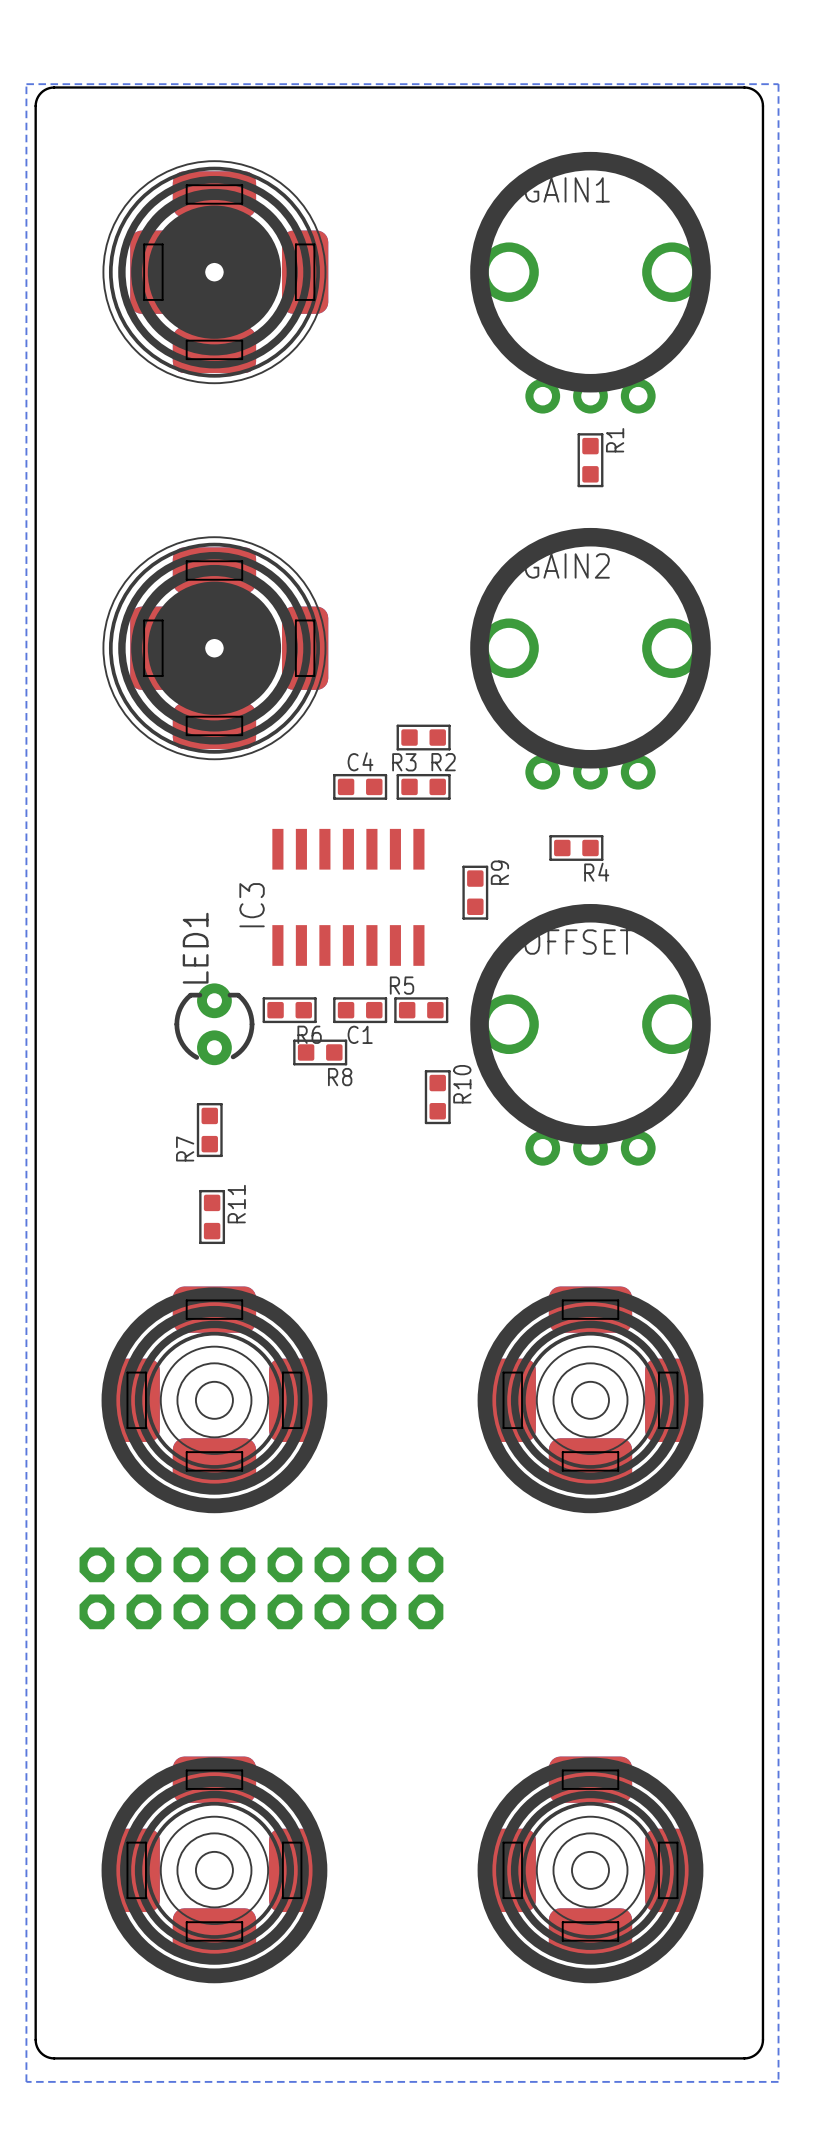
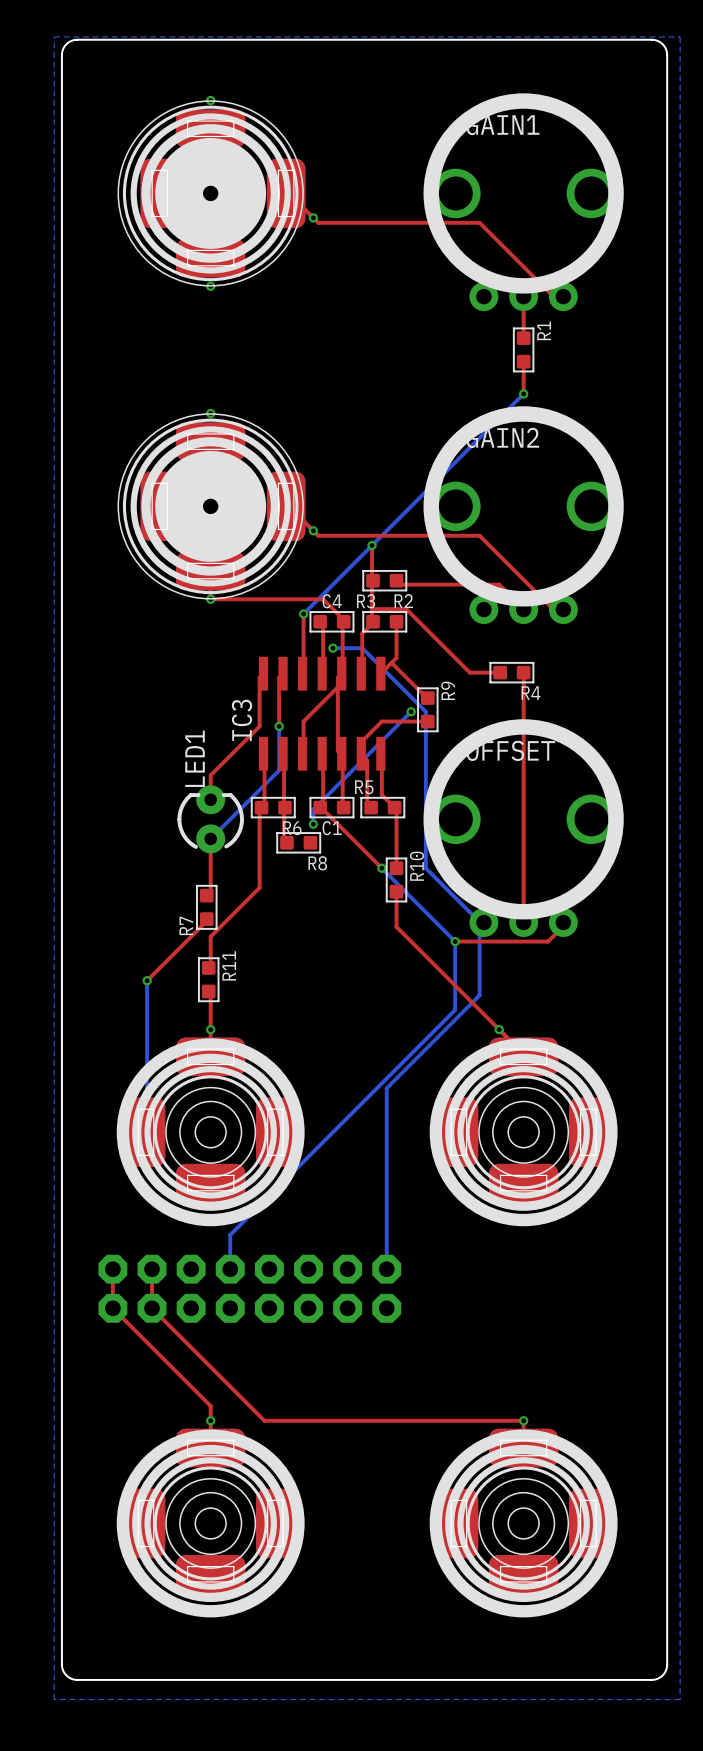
via: none -> (210, 100)
top track: none -> (286, 193) (288, 193) (318, 222) (479, 222) (552, 296) (563, 296)
via: none -> (313, 217)
via: none -> (210, 286)
top track: none -> (523, 296) (523, 338)
top track: none -> (523, 361) (523, 393)
bottom track: none -> (523, 393) (303, 613)
via: none -> (523, 393)
via: none -> (210, 413)
top track: none -> (286, 506) (288, 506) (318, 535) (479, 535) (552, 609) (563, 609)
via: none -> (313, 530)
top track: none -> (372, 545) (373, 621) (362, 633) (361, 673)
via: none -> (372, 545)
top track: none -> (210, 571) (210, 599) (323, 599) (343, 621) (341, 673)
top track: none -> (396, 580) (396, 584) (499, 584) (523, 609)
via: none -> (210, 599)
top track: none -> (372, 609) (406, 609) (469, 672) (500, 672)
top track: none -> (303, 613) (302, 673)
via: none -> (303, 613)
top track: none -> (320, 621) (323, 623) (322, 673)
top track: none -> (396, 621) (396, 657) (380, 673)
bottom track: none -> (332, 648) (362, 648) (425, 711) (425, 868) (479, 922) (483, 922) (479, 926) (479, 995) (386, 1088) (386, 1269)
via: none -> (332, 648)
top track: none -> (391, 662) (427, 698)
top track: none -> (523, 672) (523, 922)
top track: none -> (263, 673) (259, 677) (259, 726) (210, 775) (210, 799)
top track: none -> (283, 673) (279, 677) (279, 726)
top track: none -> (341, 673) (337, 677) (337, 750) (342, 755) (343, 807)
top track: none -> (341, 673) (337, 687) (303, 721) (302, 753)
bottom track: none -> (411, 711) (313, 809) (313, 824)
via: none -> (411, 711)
top track: none -> (427, 721) (381, 721) (362, 741) (361, 753) (367, 760) (367, 804) (371, 807)
bottom track: none -> (279, 726) (279, 770) (210, 838)
via: none -> (279, 726)
top track: none -> (263, 753) (264, 804) (259, 809) (259, 887) (210, 936) (210, 966) (208, 967)
top track: none -> (283, 753) (284, 838) (286, 842)
top track: none -> (322, 753) (323, 804) (320, 807) (381, 868)
top track: none -> (380, 753) (381, 794) (396, 809) (396, 868)
via: none -> (313, 824)
top track: none -> (210, 838) (210, 892) (206, 895)
bottom track: none -> (381, 868) (455, 941) (455, 1010) (230, 1234) (230, 1269)
via: none -> (381, 868)
top track: none -> (396, 891) (396, 926) (523, 1054) (523, 1056)
top track: none -> (206, 919) (147, 980)
top track: none -> (563, 922) (562, 926) (548, 941) (455, 941)
via: none -> (455, 941)
bottom track: none -> (147, 980) (146, 1132)
via: none -> (147, 980)
top track: none -> (208, 991) (210, 995) (210, 1056)
via: none -> (210, 1029)
via: none -> (499, 1029)
top track: none -> (112, 1269) (112, 1308) (210, 1406) (210, 1448)
top track: none -> (152, 1269) (152, 1308) (264, 1420) (523, 1420) (523, 1448)
via: none -> (210, 1420)
via: none -> (523, 1420)

